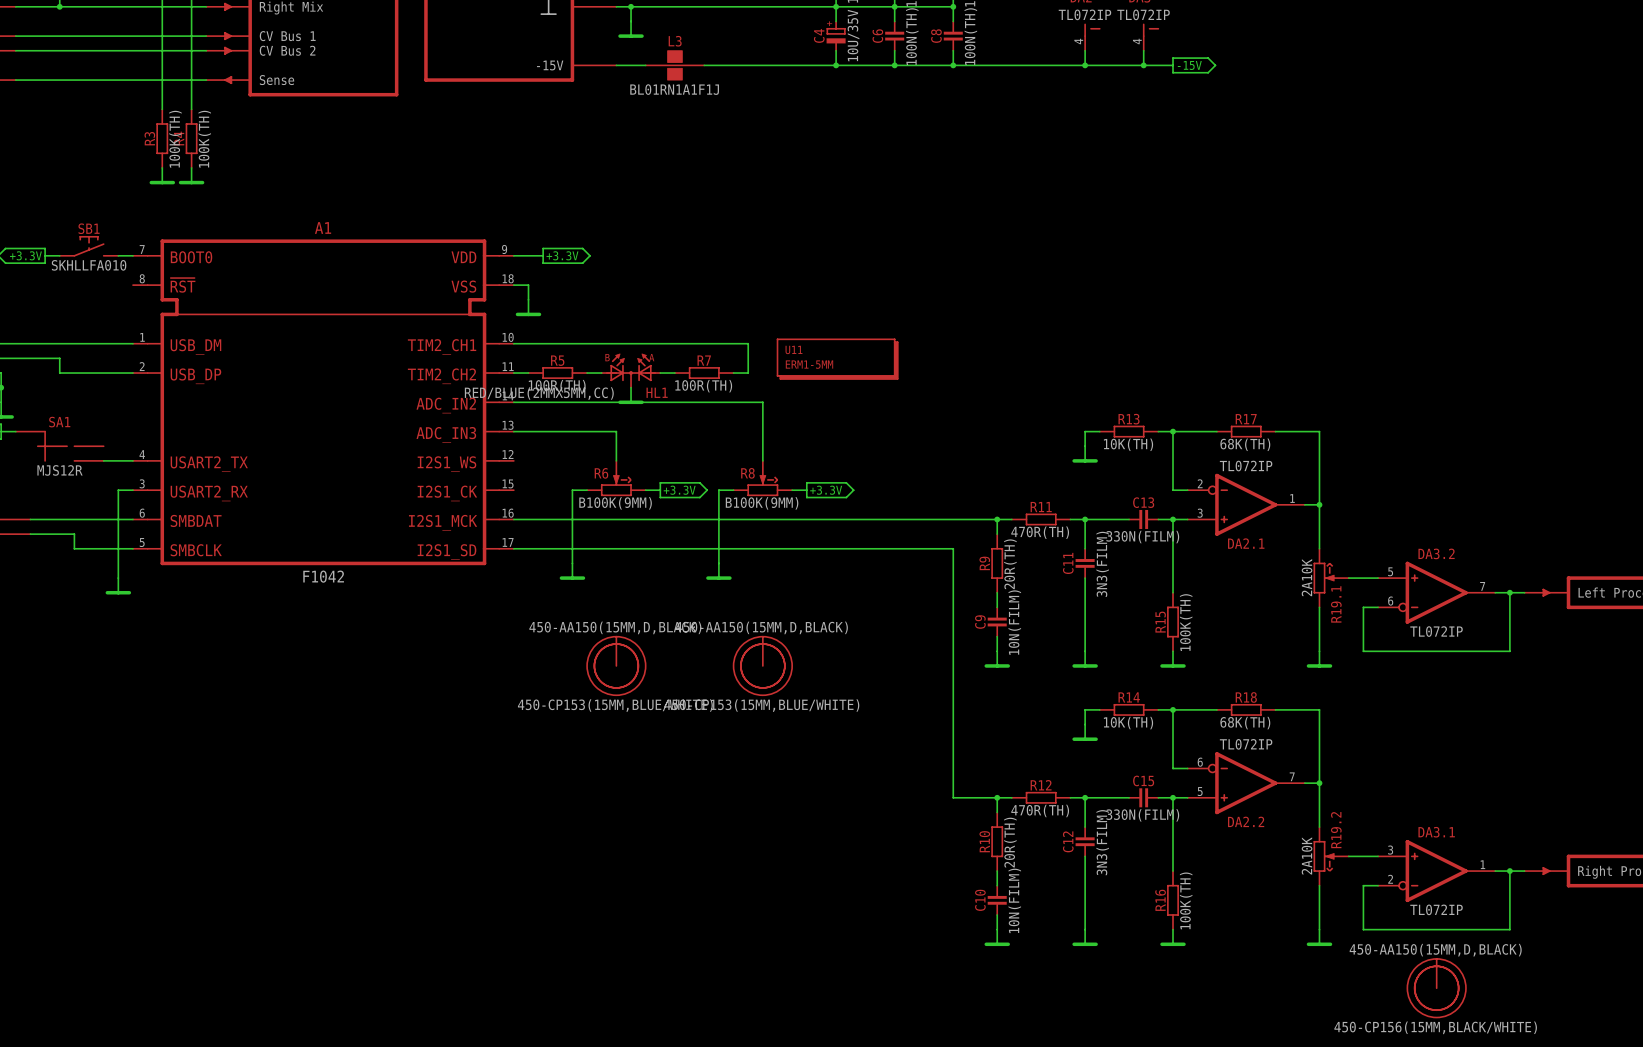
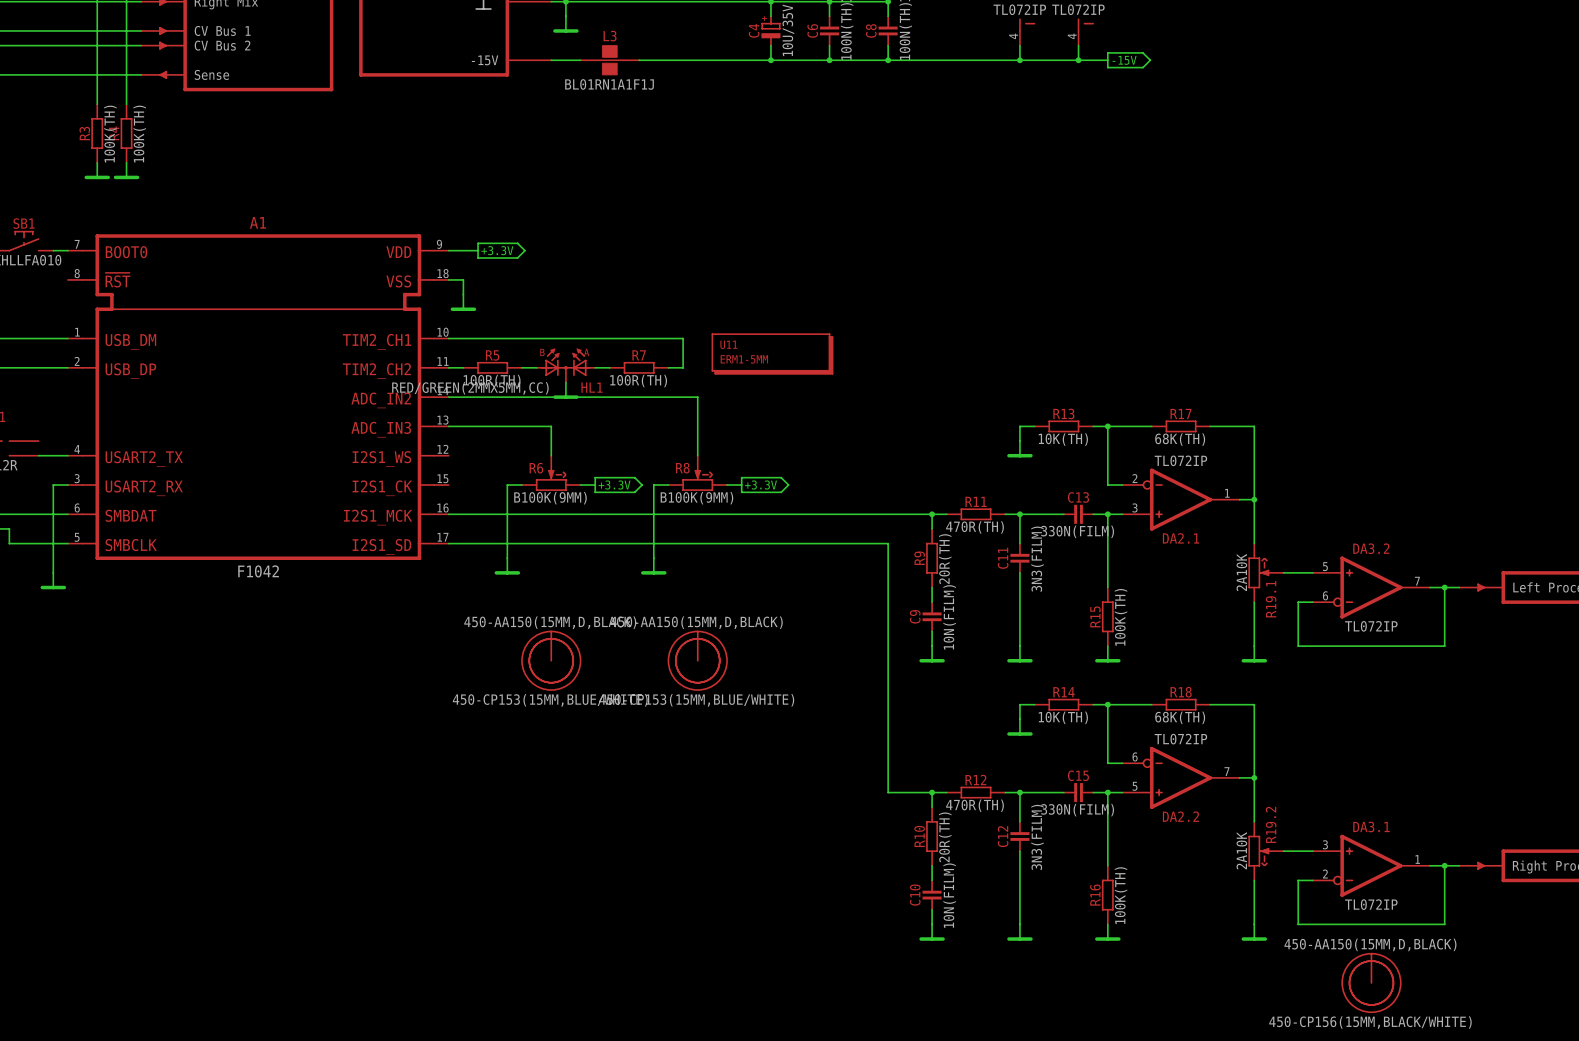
HL1 value: RED/BLUE(2MMX5MM,CC) (539, 393) -> RED/GREEN(2MMX5MM,CC) (470, 388)

